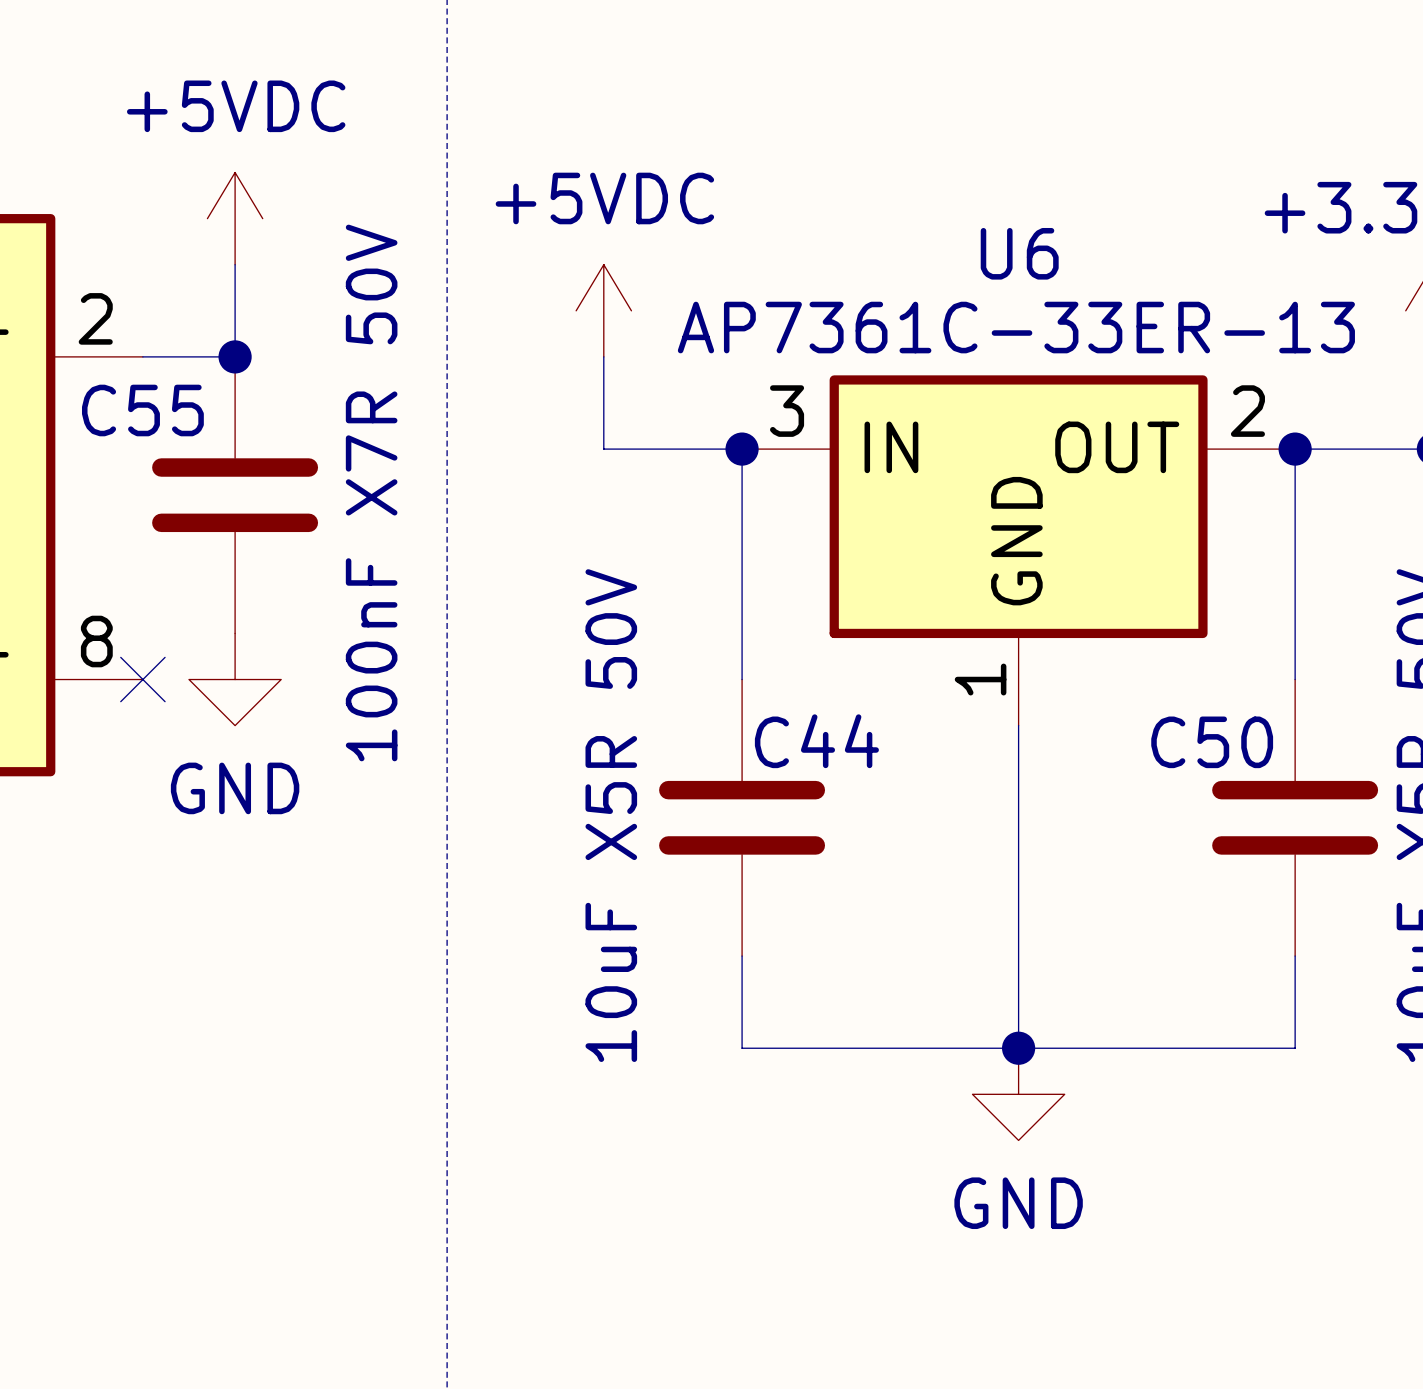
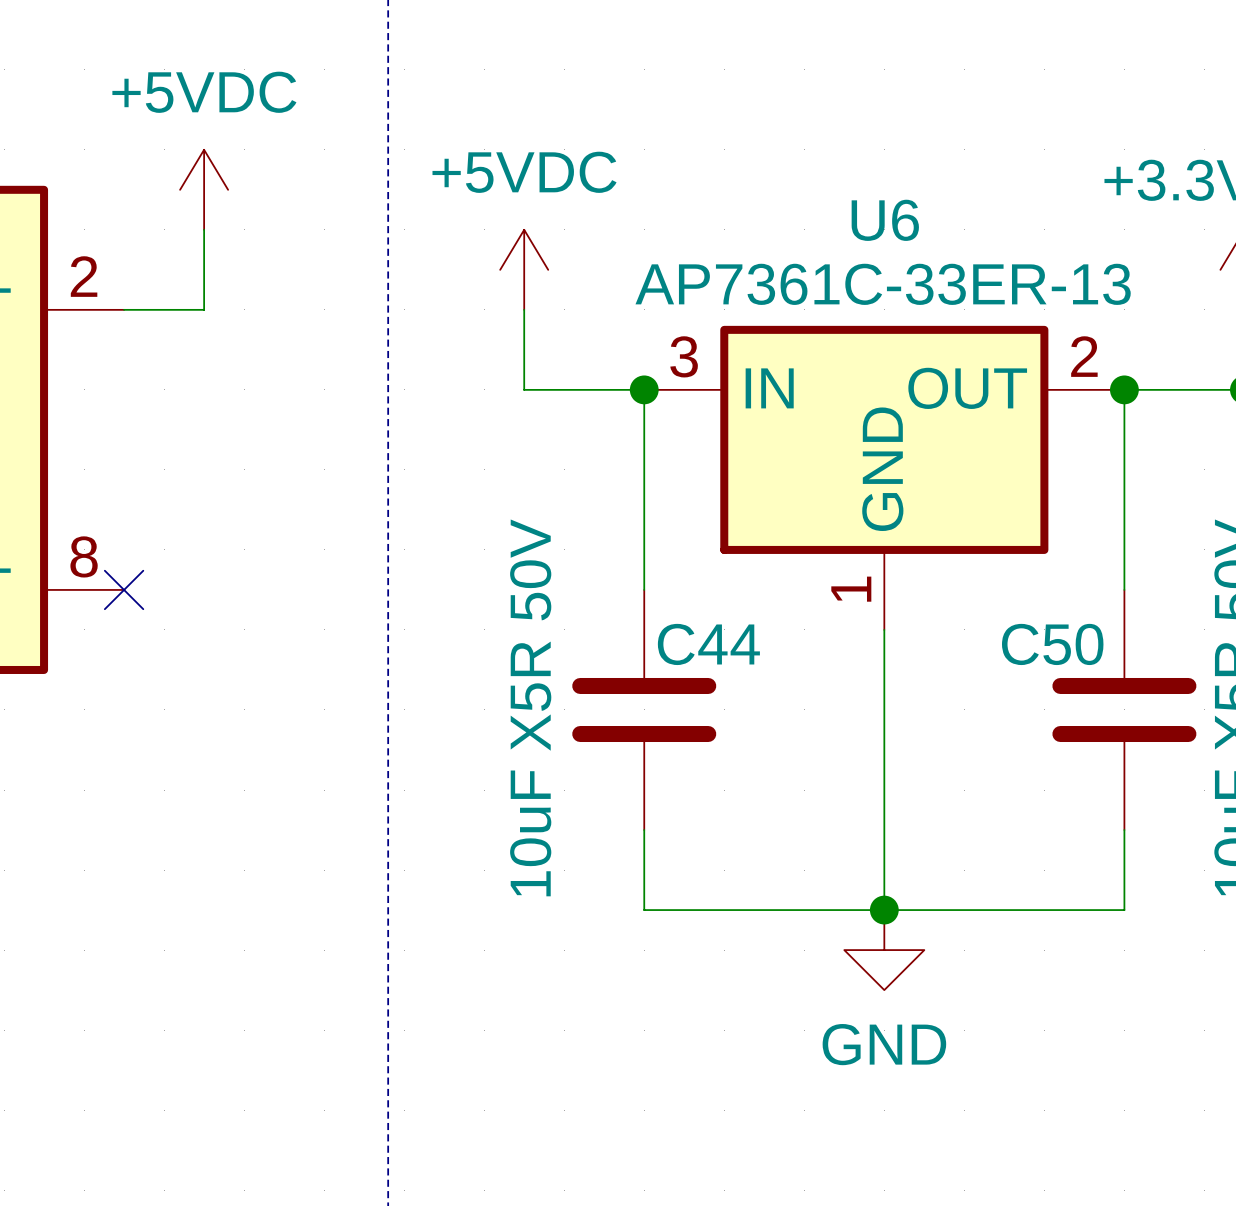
junction: (235, 356) -> none
C55: 100nF X7R 50V (235, 495) -> none
power symbol: GND (235, 679) -> none

